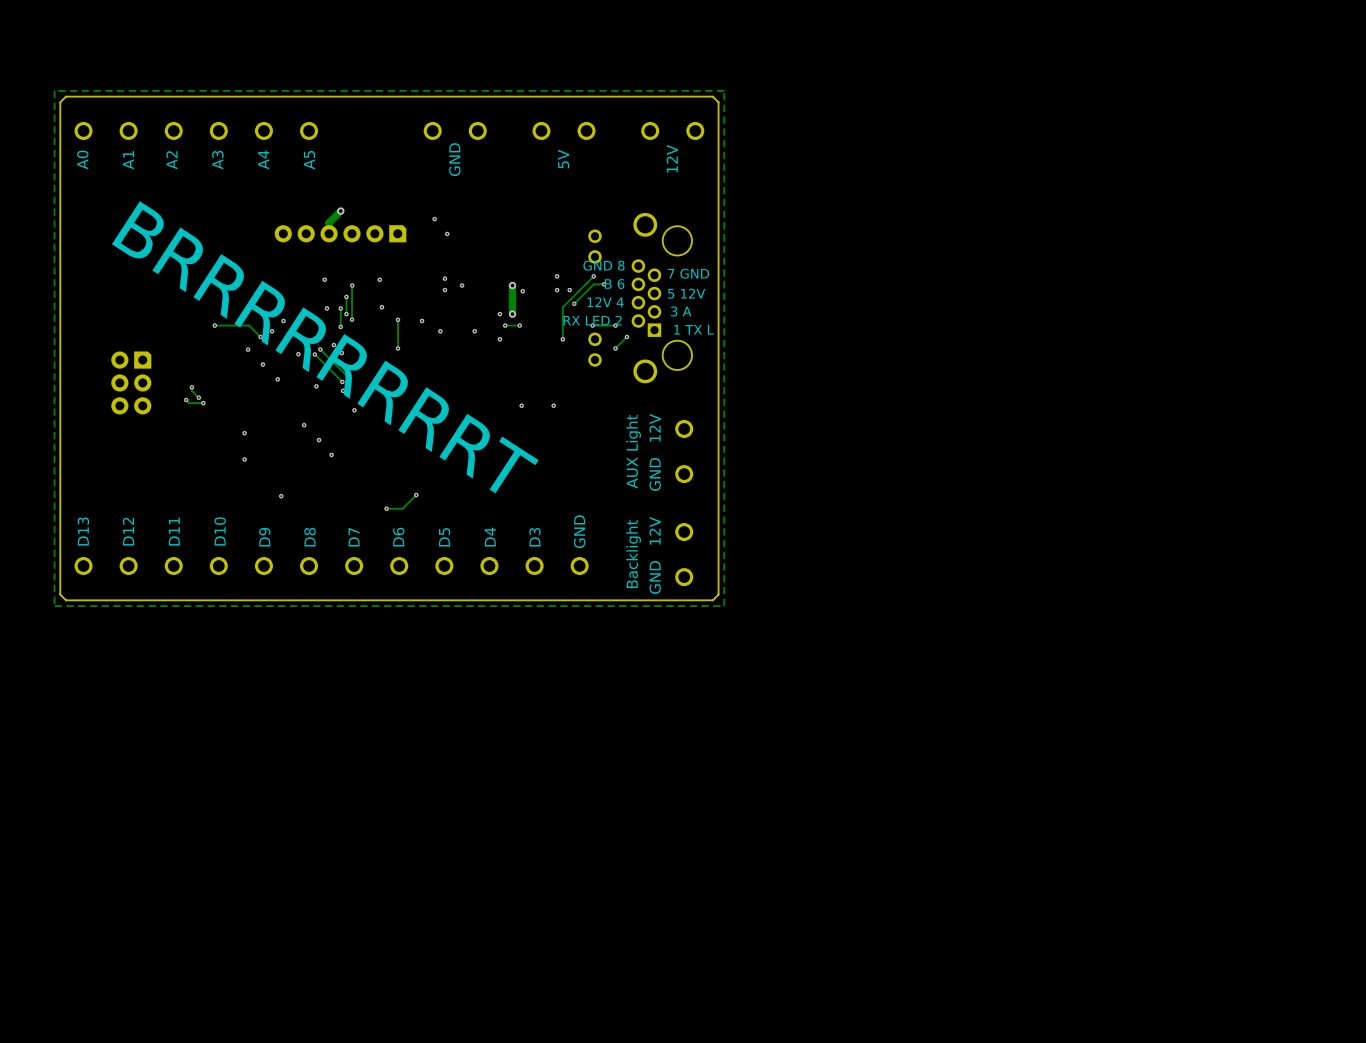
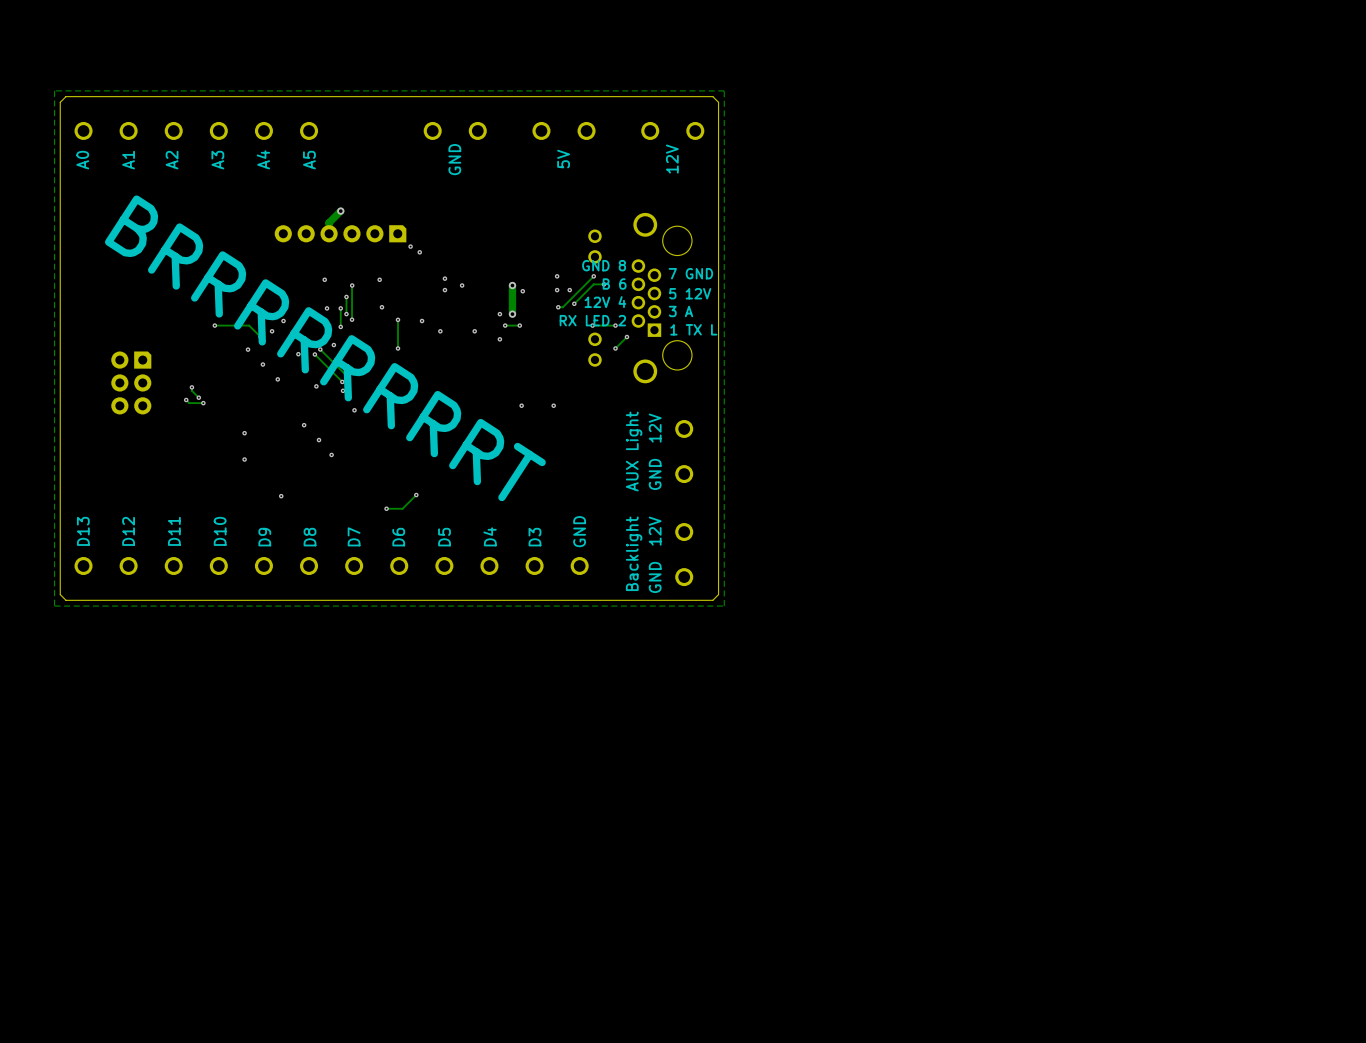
via: (434, 219) -> none
via: (447, 233) -> none
via: none -> (410, 246)
via: none -> (419, 252)
track: (562, 307) (562, 339) -> (562, 307) (558, 307)
via position: (562, 339) -> (558, 307)

